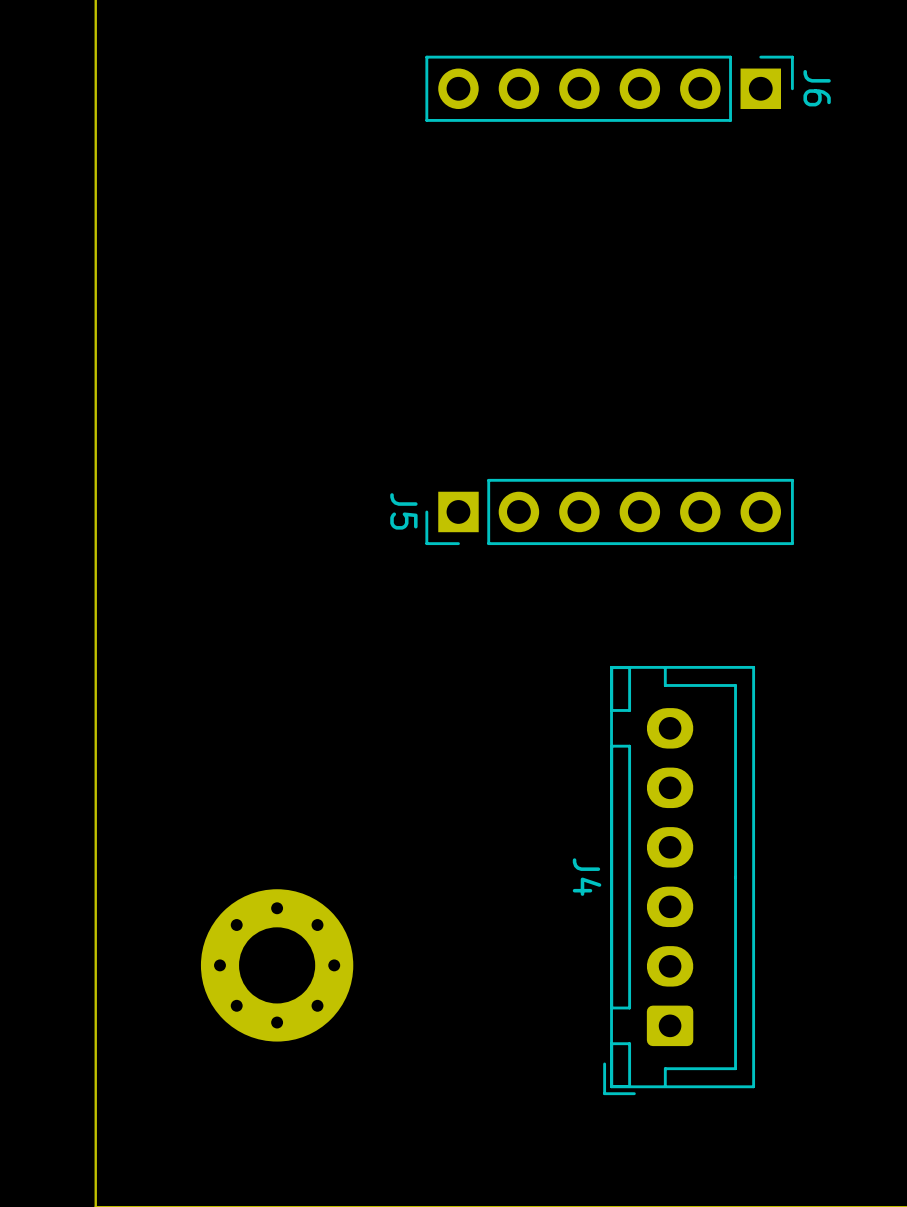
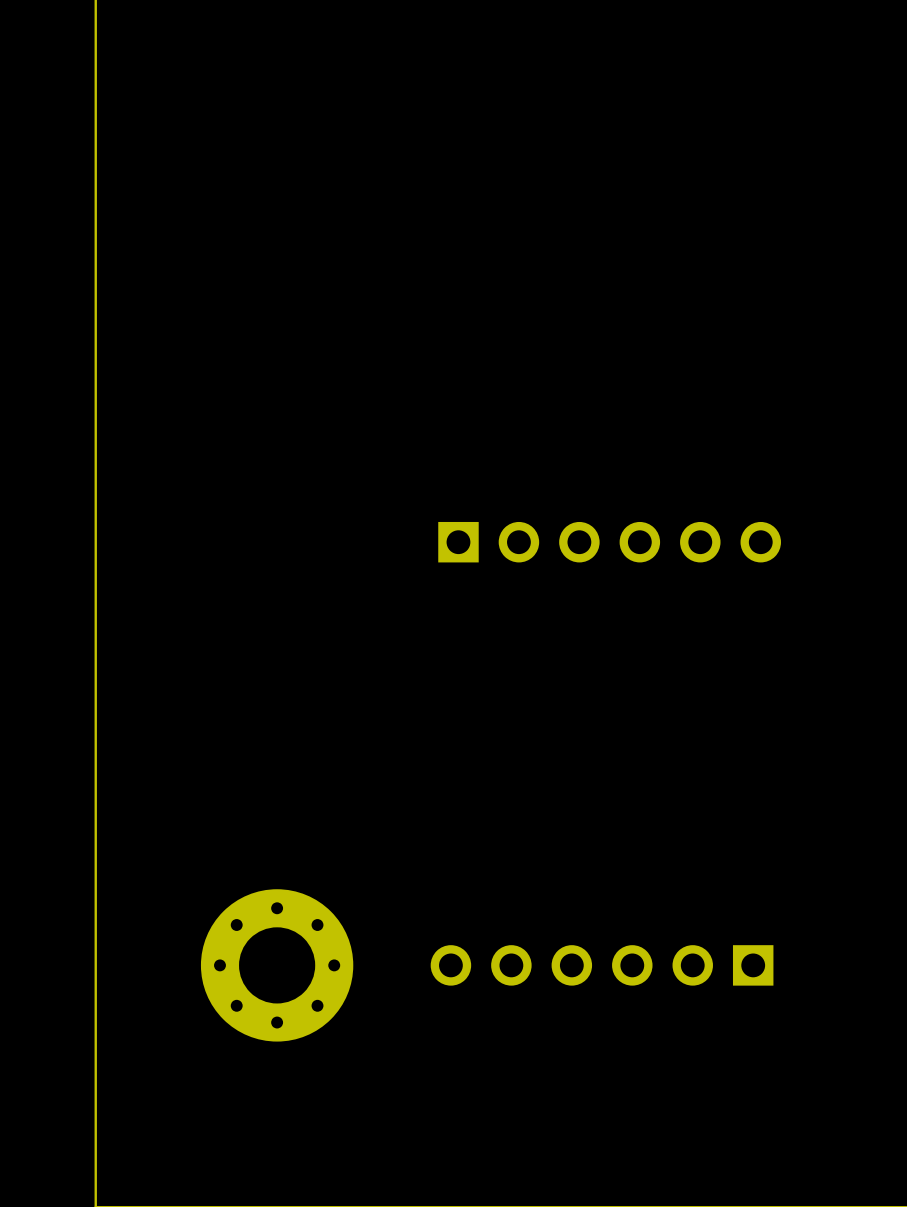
J6 side: bottom (609, 88) -> top (609, 542)
J5 side: bottom (609, 511) -> top (602, 965)
J4: (679, 880) -> none

